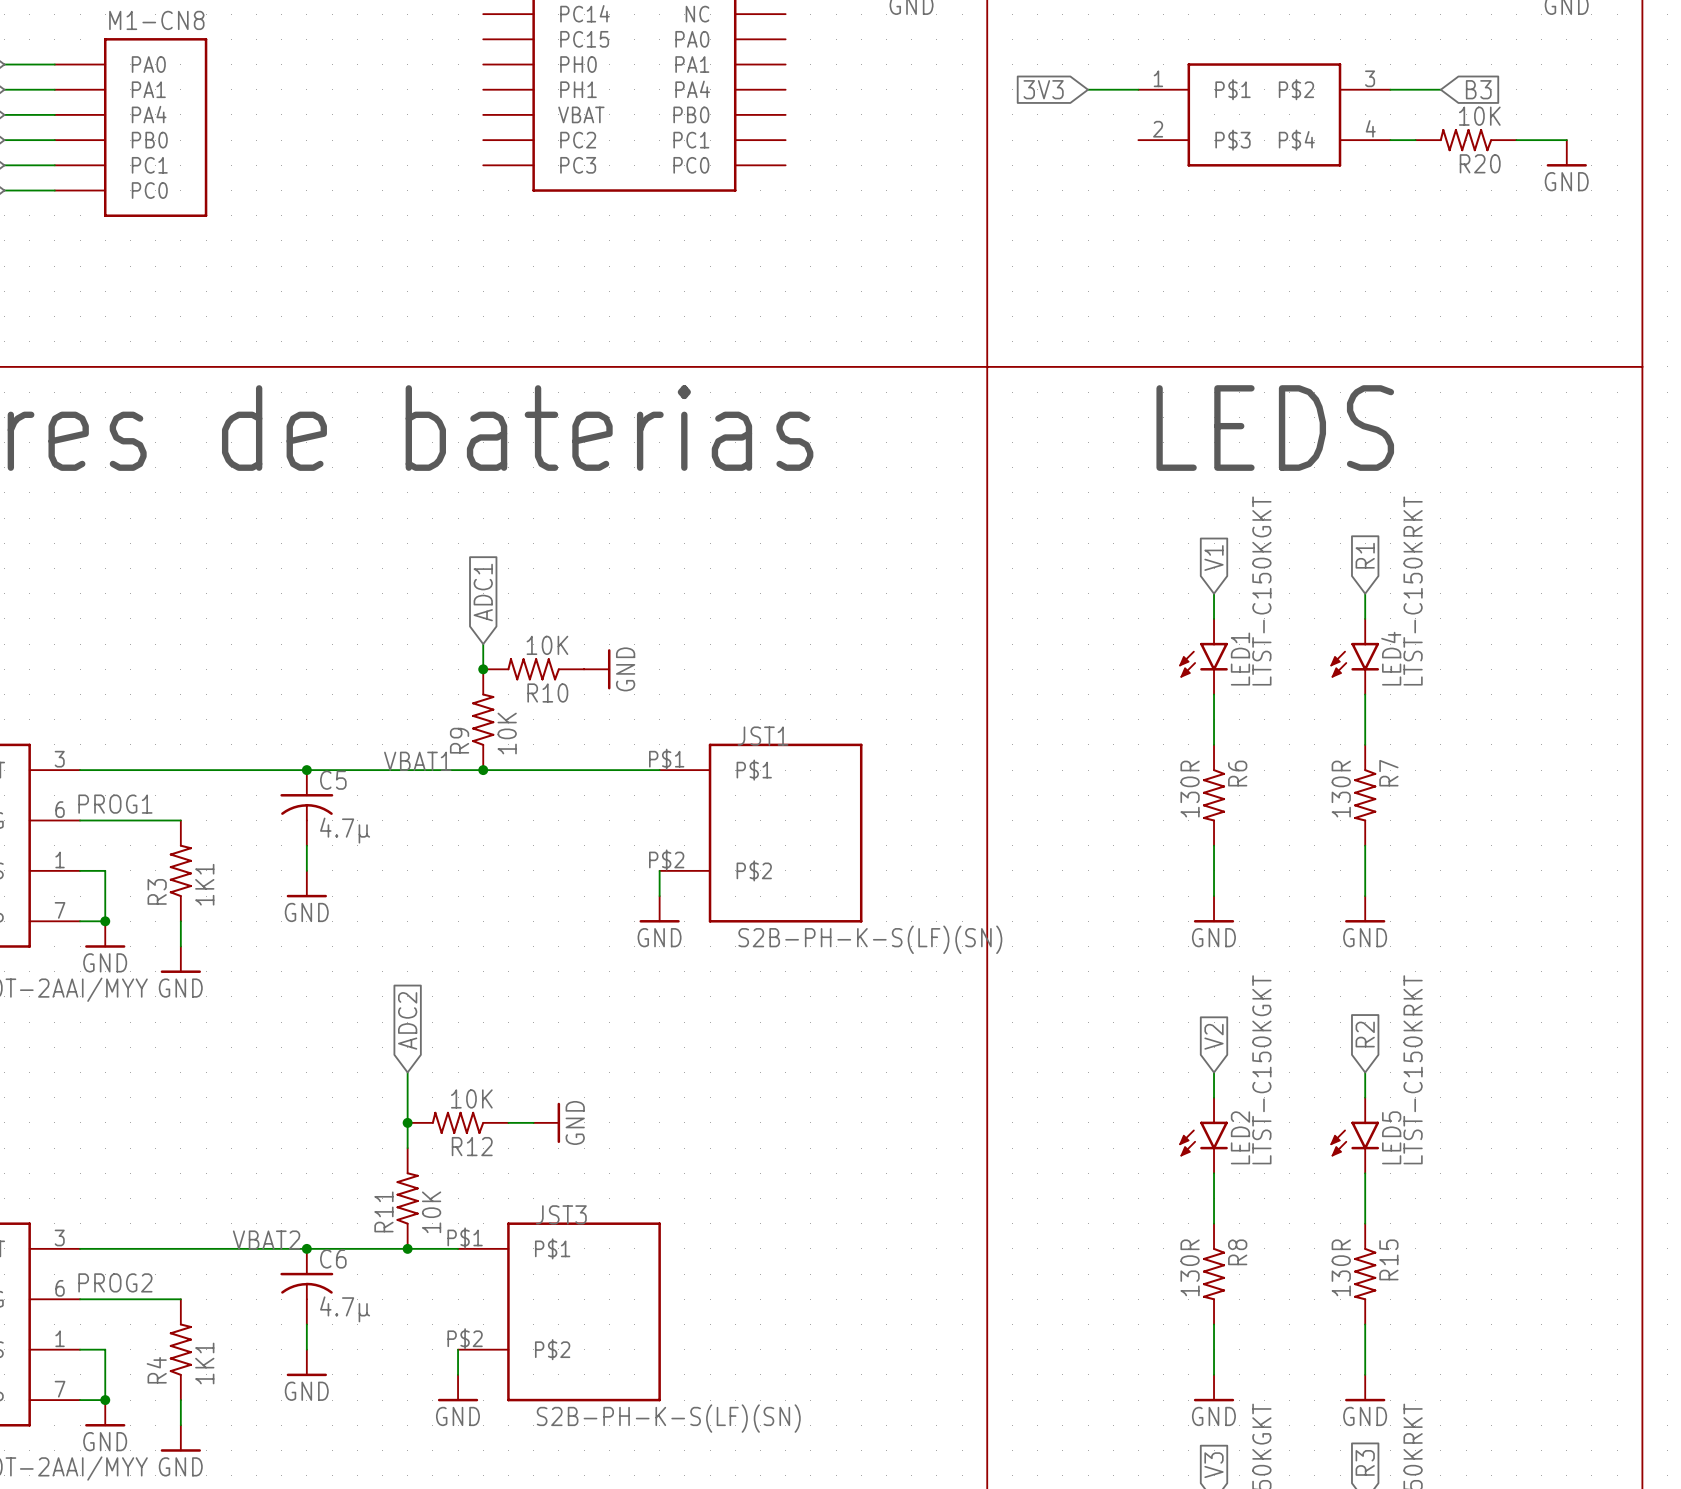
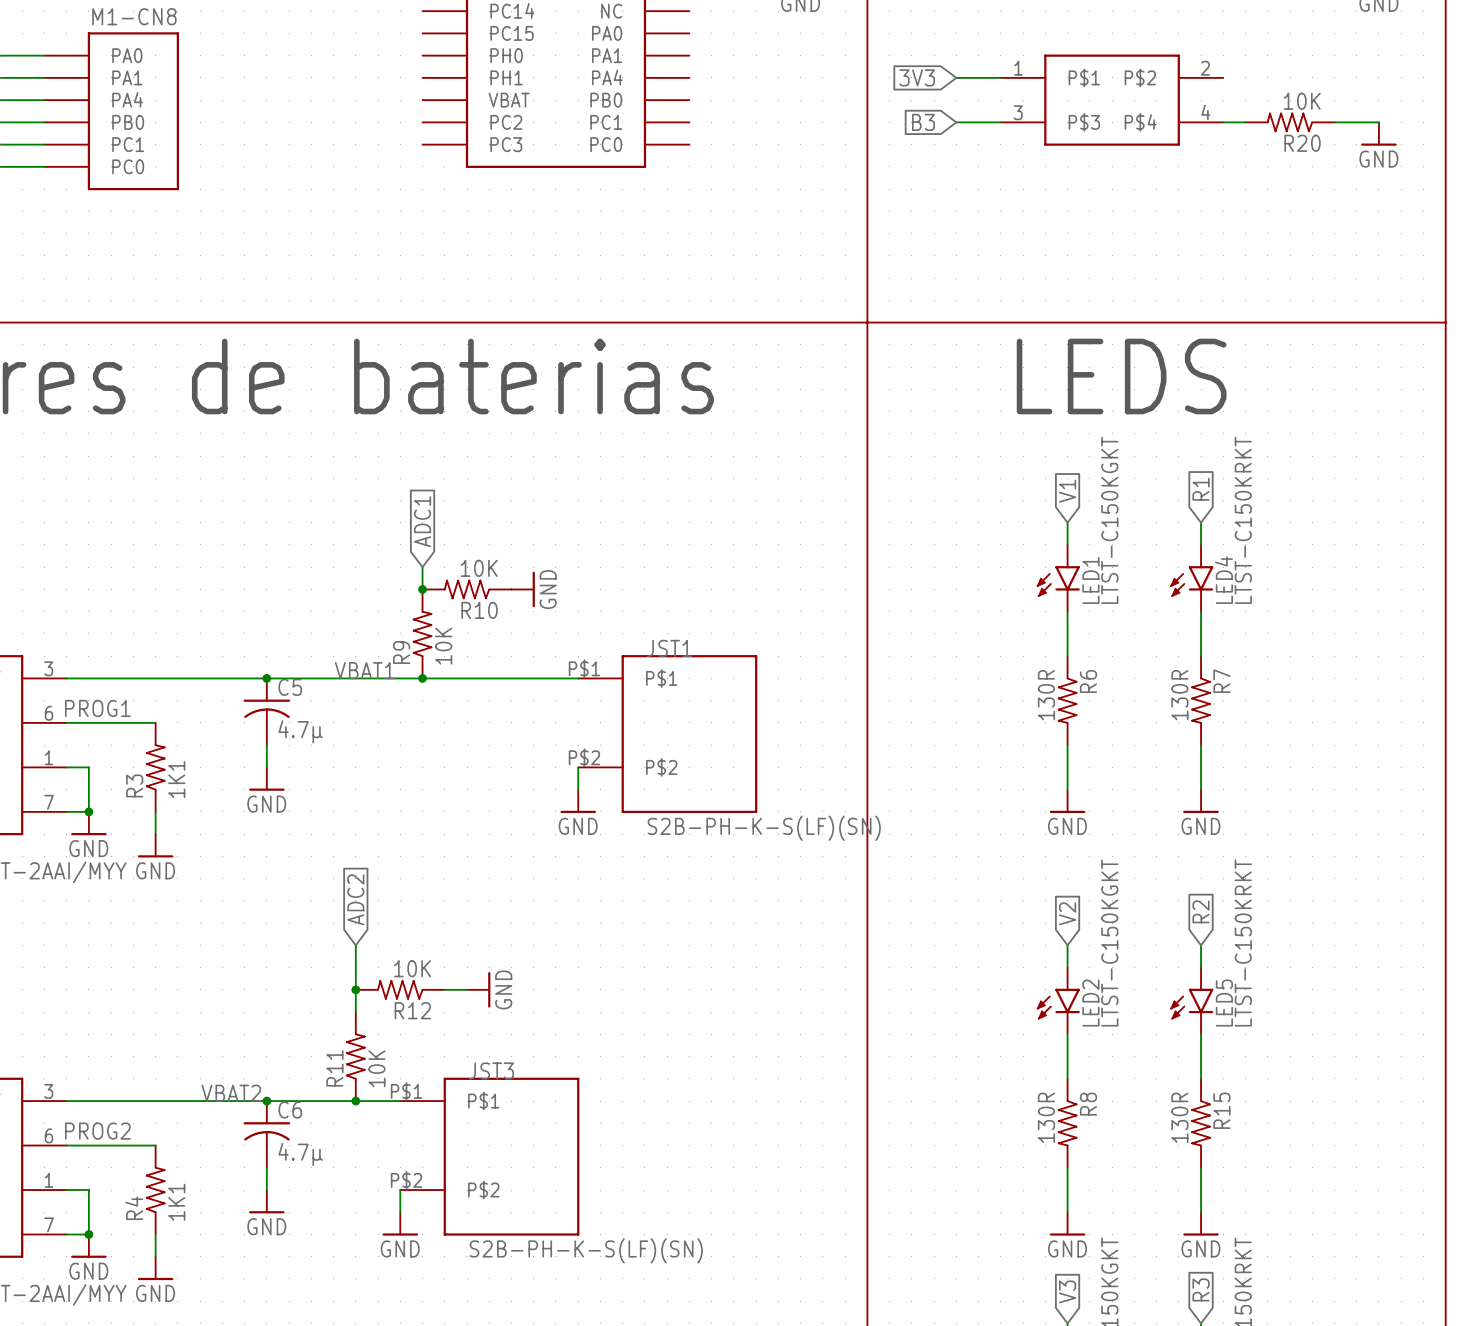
part pin number: 3 (1370, 78) -> 2 (1205, 68)
wire: (1390, 89) (1440, 89) -> none
global label: B3 (1478, 89) -> none
part pin number: 2 (1158, 129) -> 3 (1018, 112)
global label: none -> B3 (923, 122)
wire: none -> (956, 122) (1000, 122)

